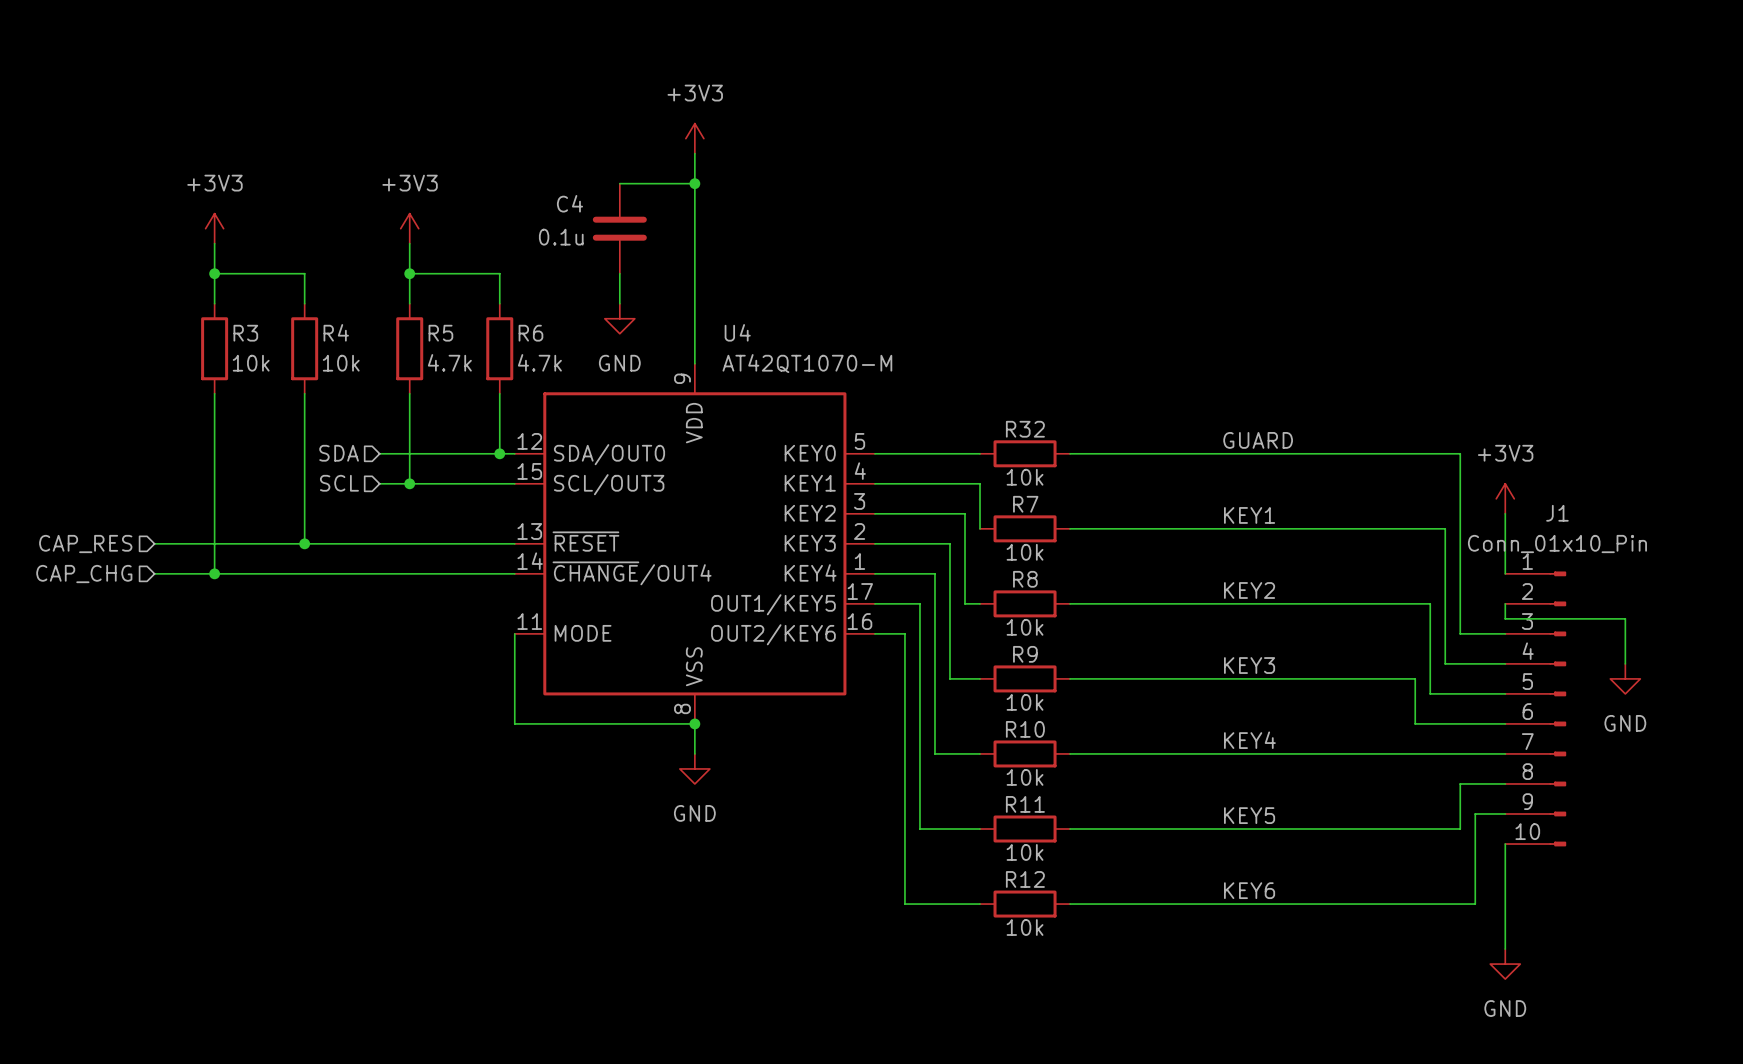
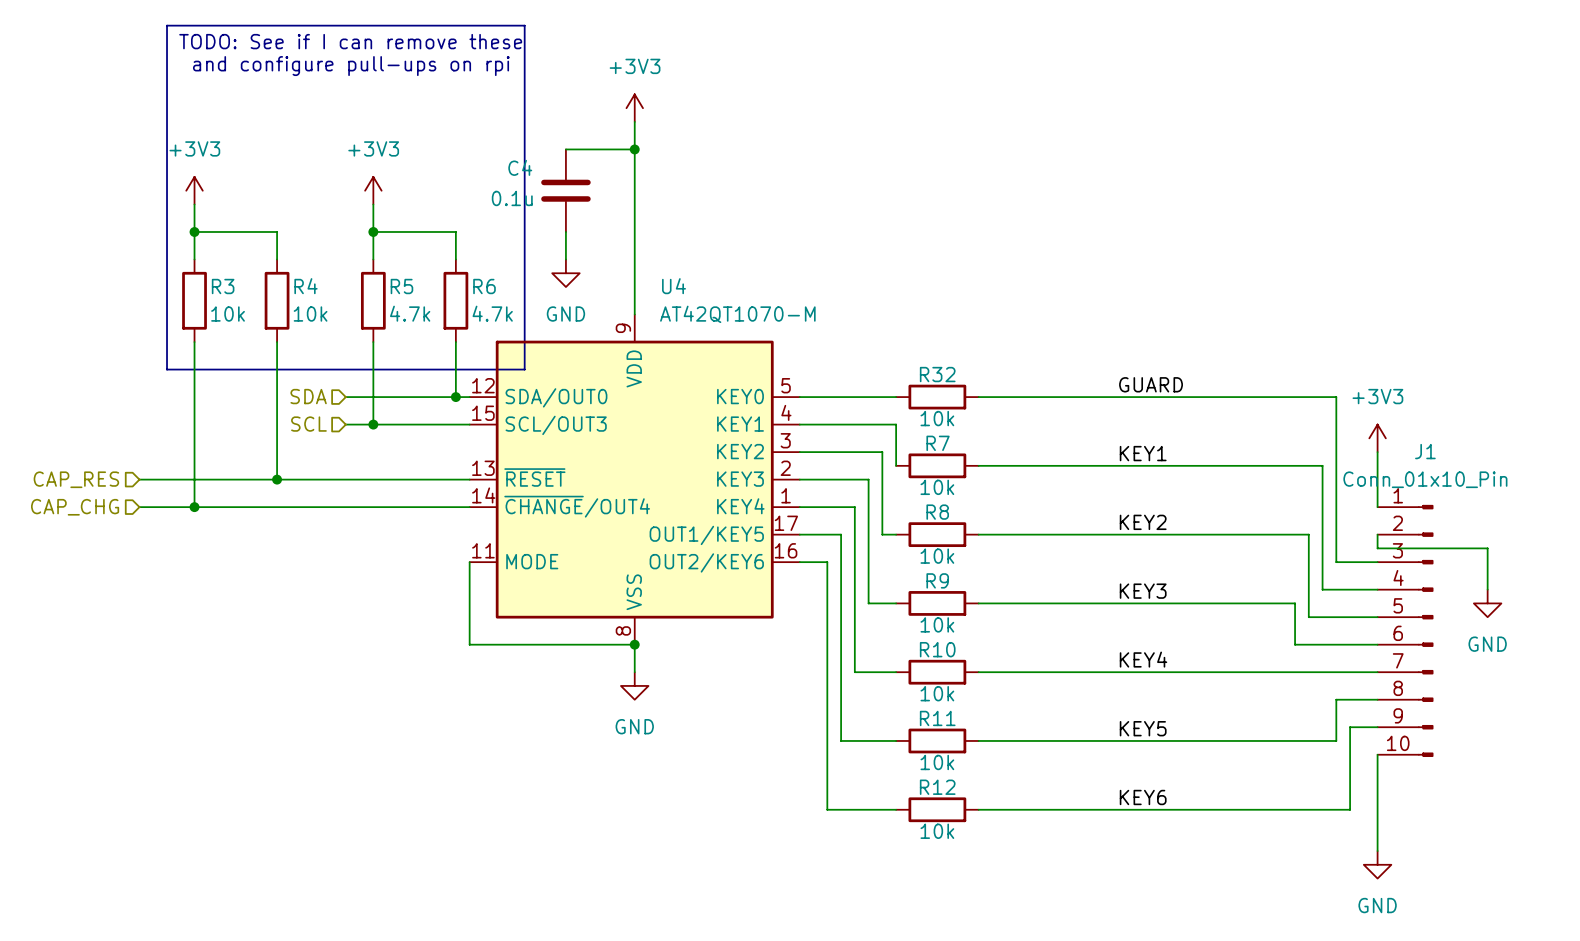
line: none -> (167, 25) (524, 25) (524, 369) (167, 369) (167, 25)
text: none -> TODO: See if I can remove these (350, 41)
text: none -> and configure pull-ups on rpi (351, 66)

